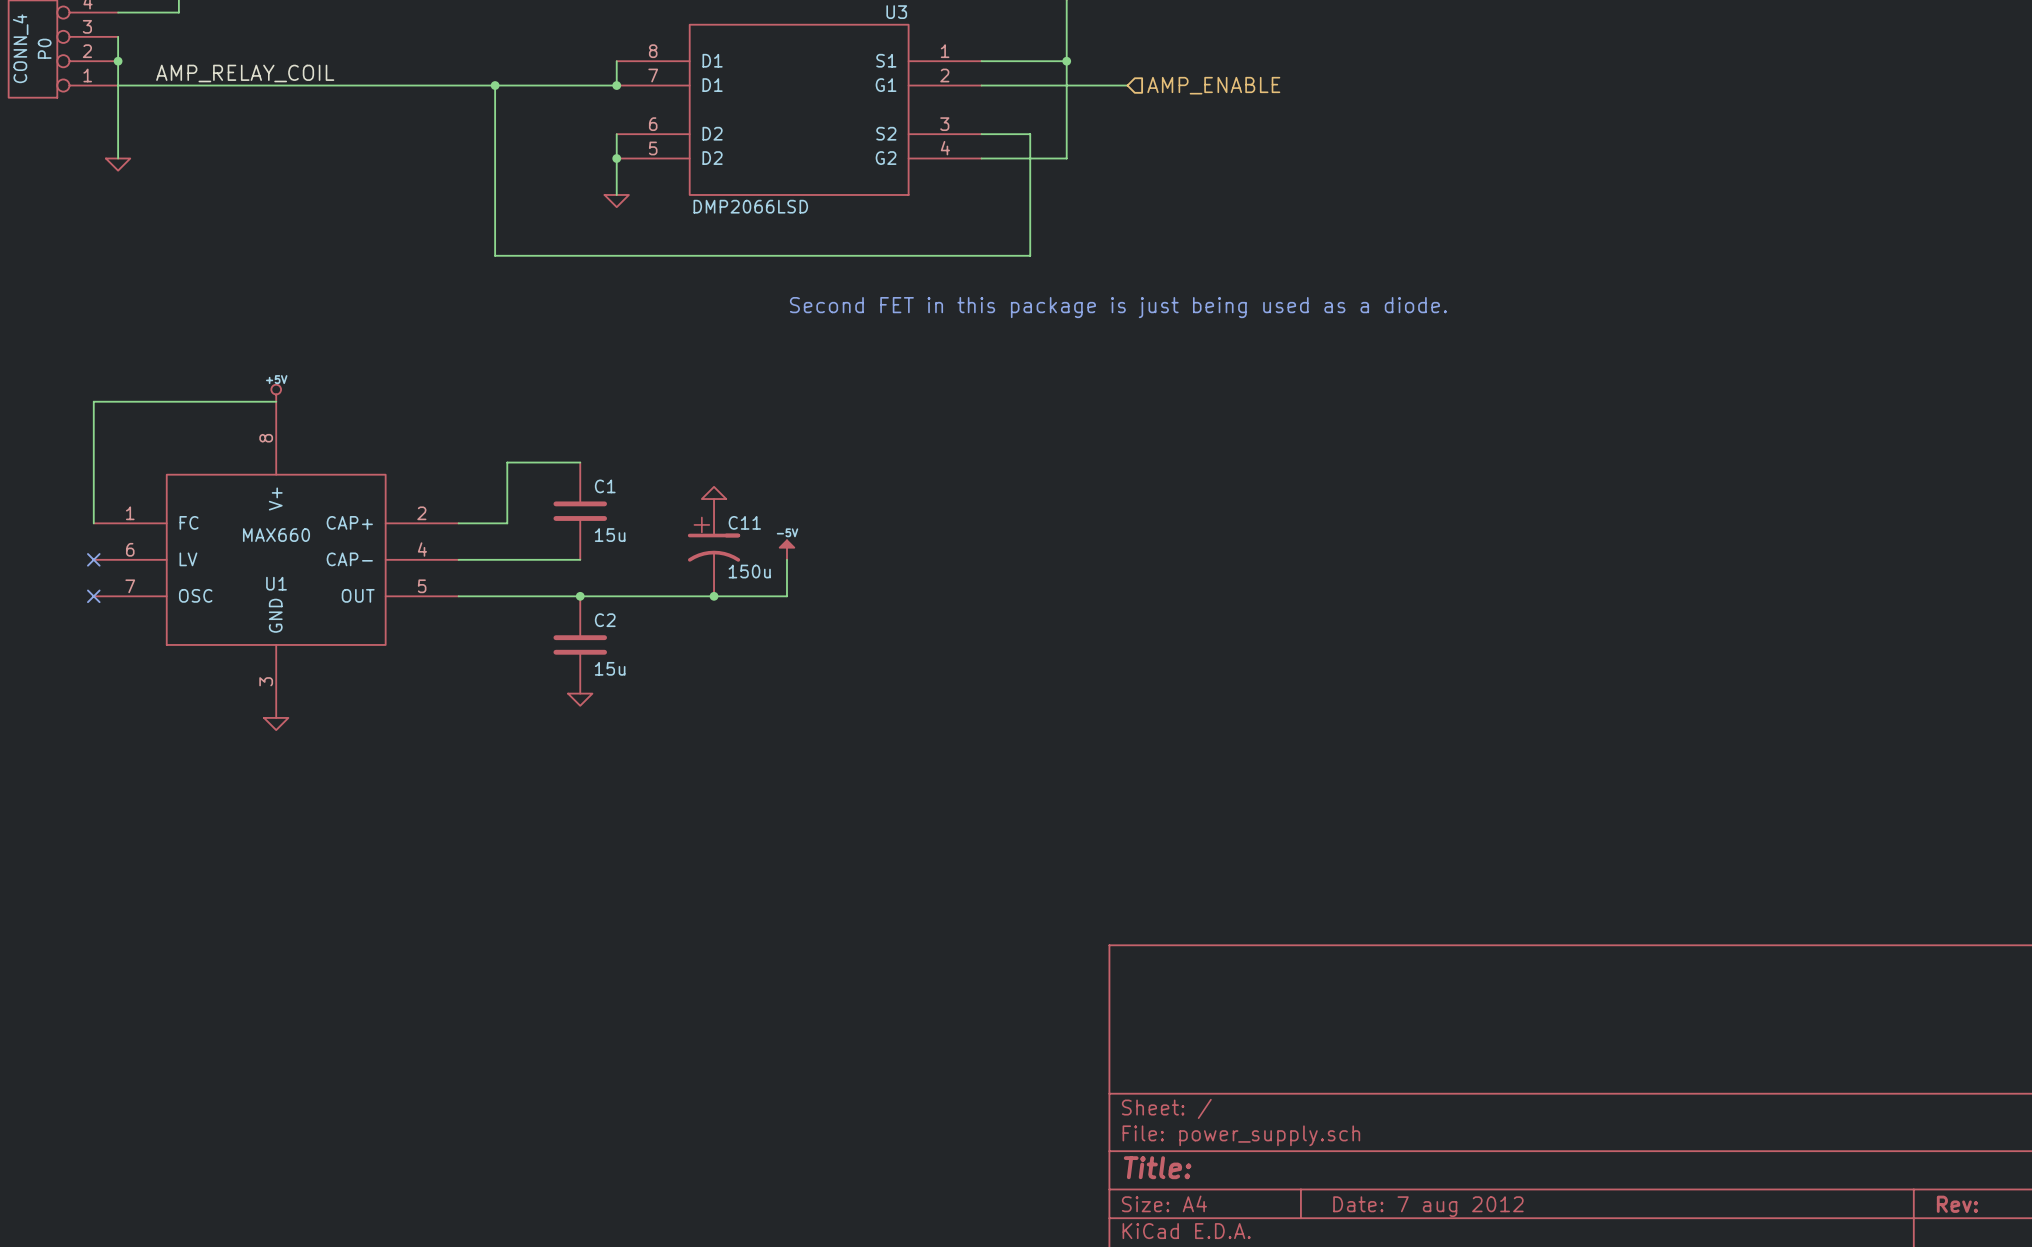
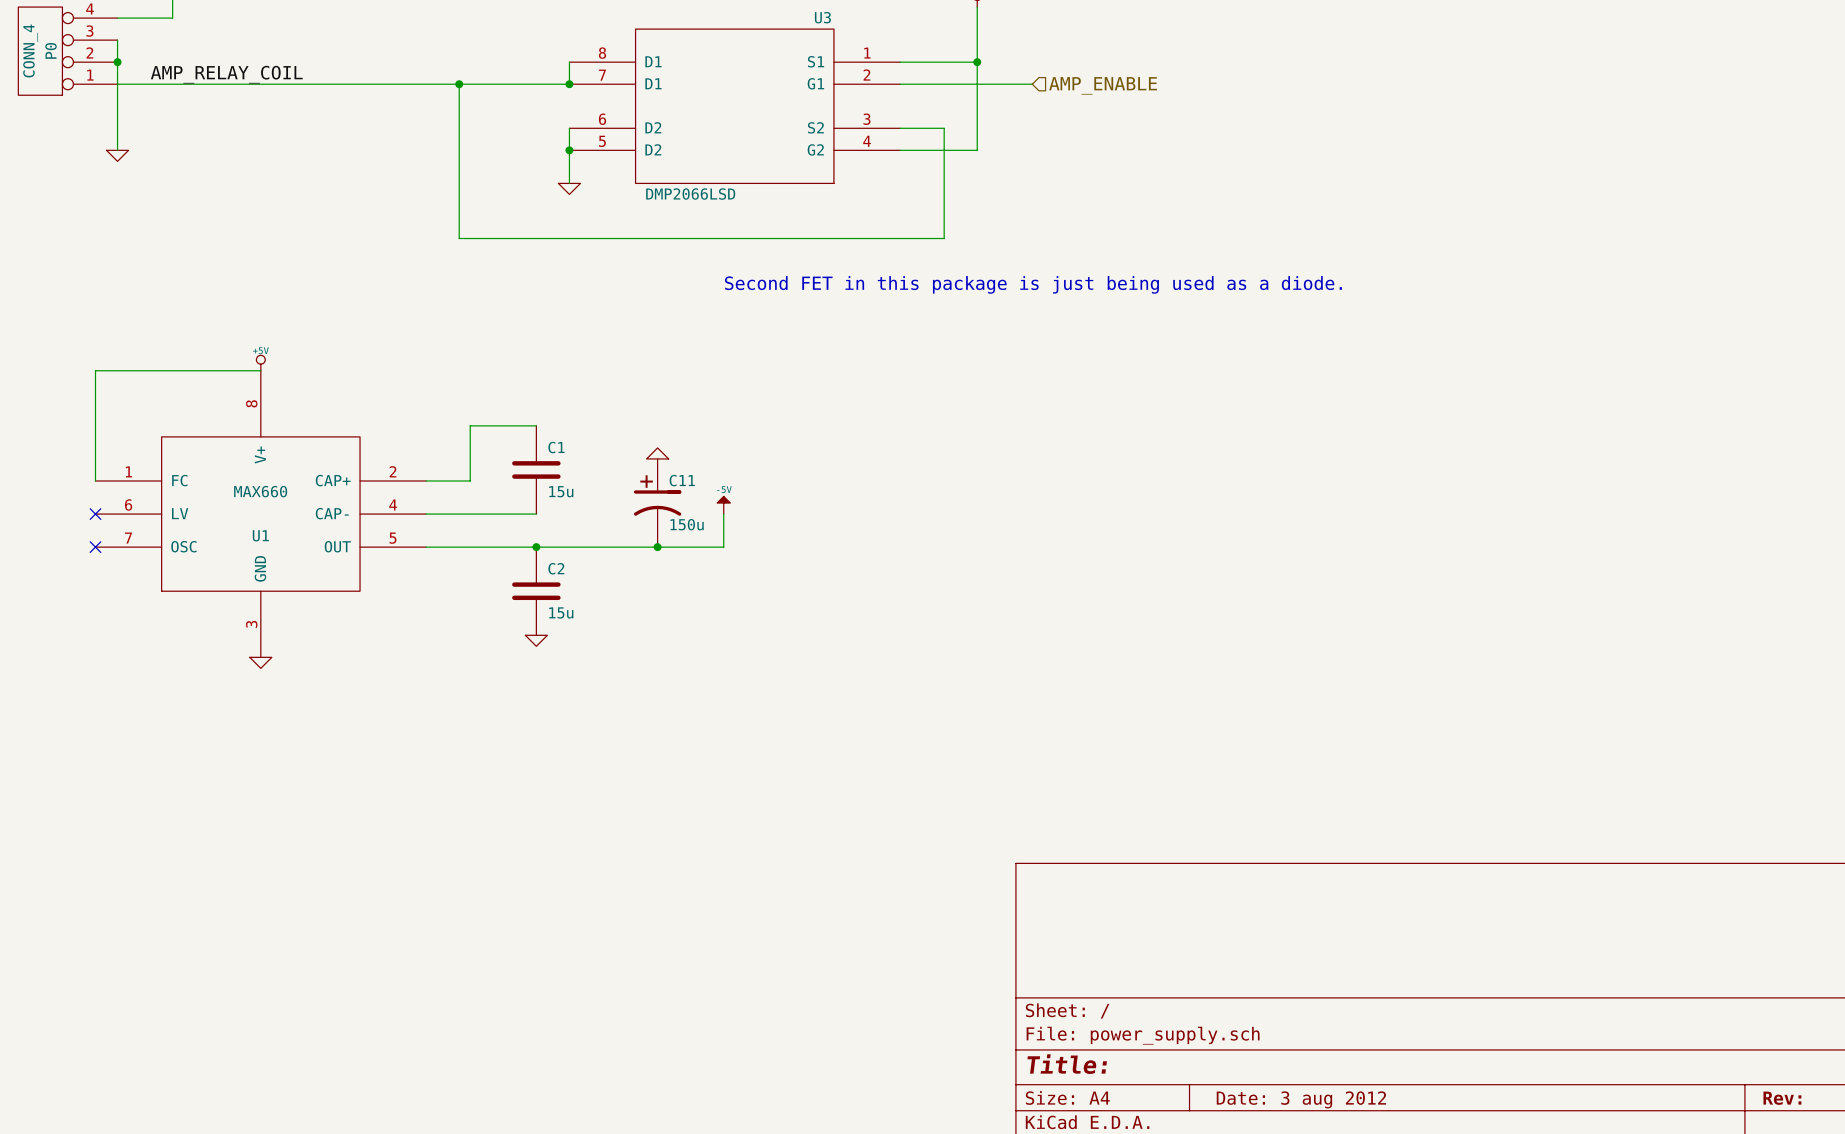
title block: Date: 7 aug 2012 (1428, 1206) -> Date: 3 aug 2012 (1301, 1099)

